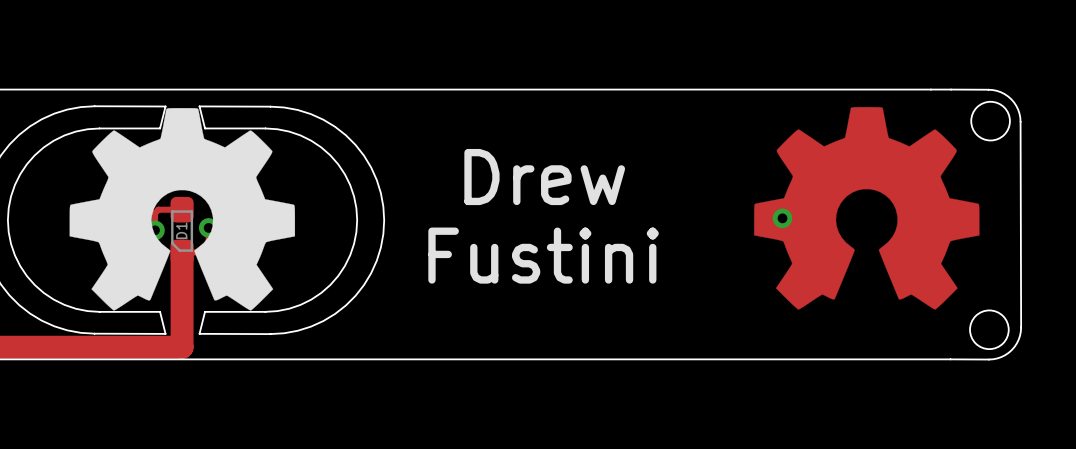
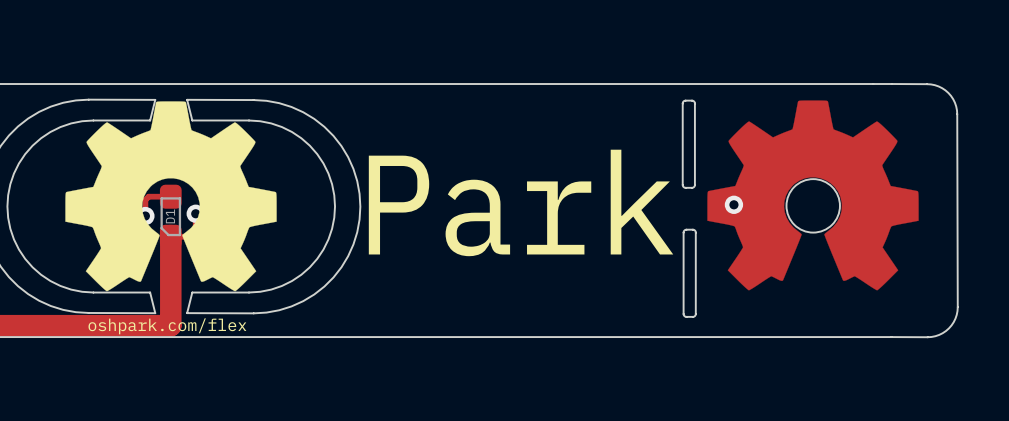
round board edge: [970, 101, 1011, 142] -> none
board edge: none -> (685, 100) (692, 100) (694, 103) (694, 184) (692, 187) (684, 187) (682, 185) (682, 103) (685, 100)
text: Drew (544, 177) -> none
round board edge: none -> [785, 178, 841, 234]
text: none -> Park (521, 202)
board edge: none -> (686, 229) (693, 229) (695, 232) (695, 313) (693, 316) (685, 316) (683, 314) (683, 232) (686, 229)
text: Fustini (543, 255) -> none
round board edge: [969, 309, 1010, 350] -> none
text: none -> oshpark.com/flex (167, 326)

